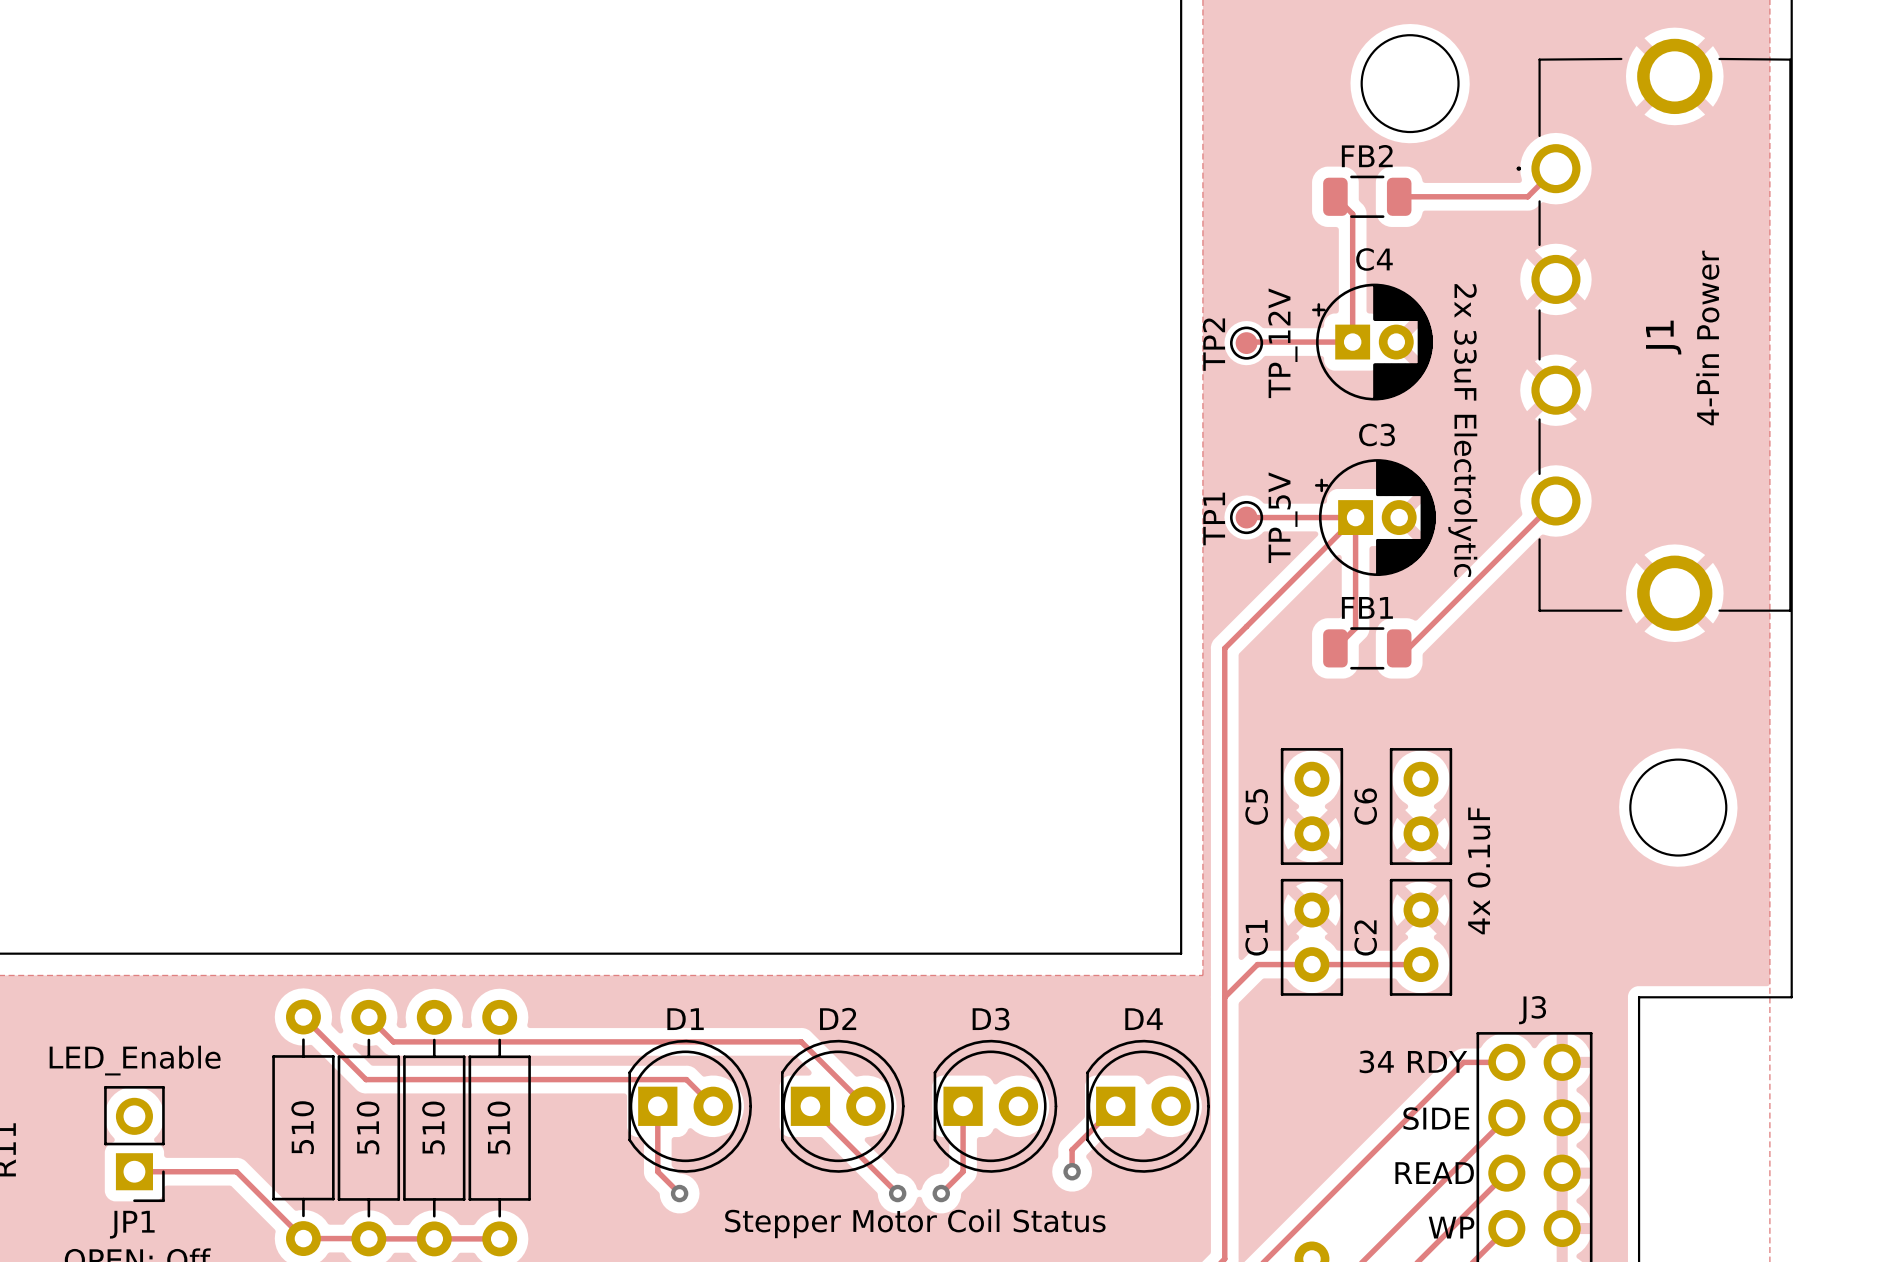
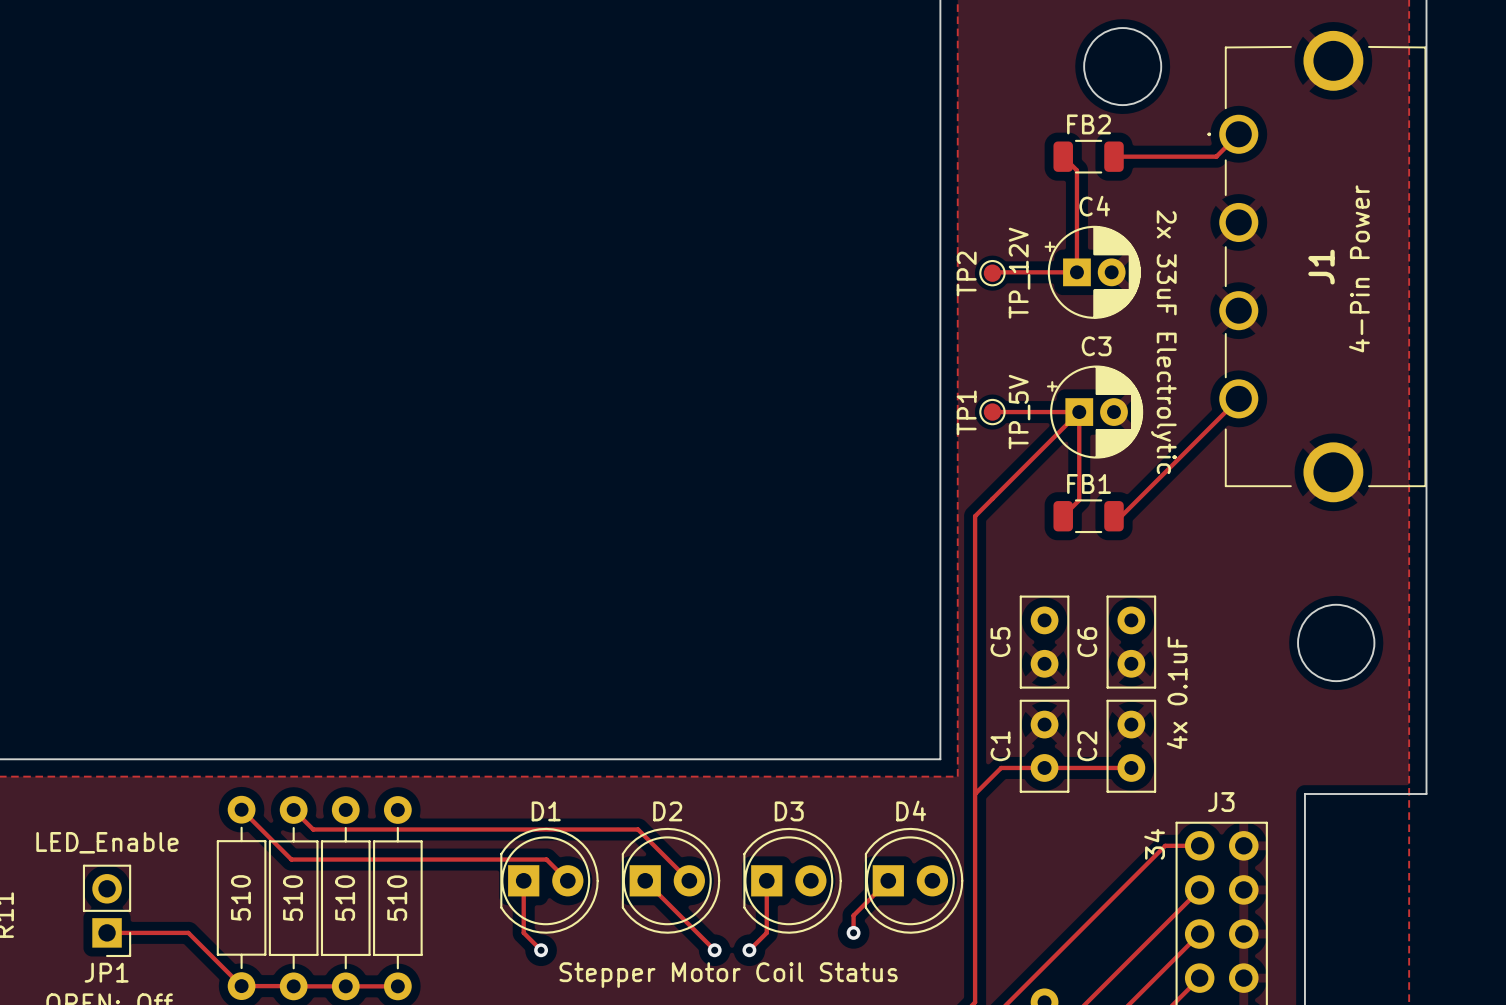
text: none -> 34 (1154, 844)
text: 34 RDY (1413, 1061) -> none
text: SIDE (1436, 1118) -> none
text: READ (1434, 1173) -> none
text: WP (1451, 1227) -> none

